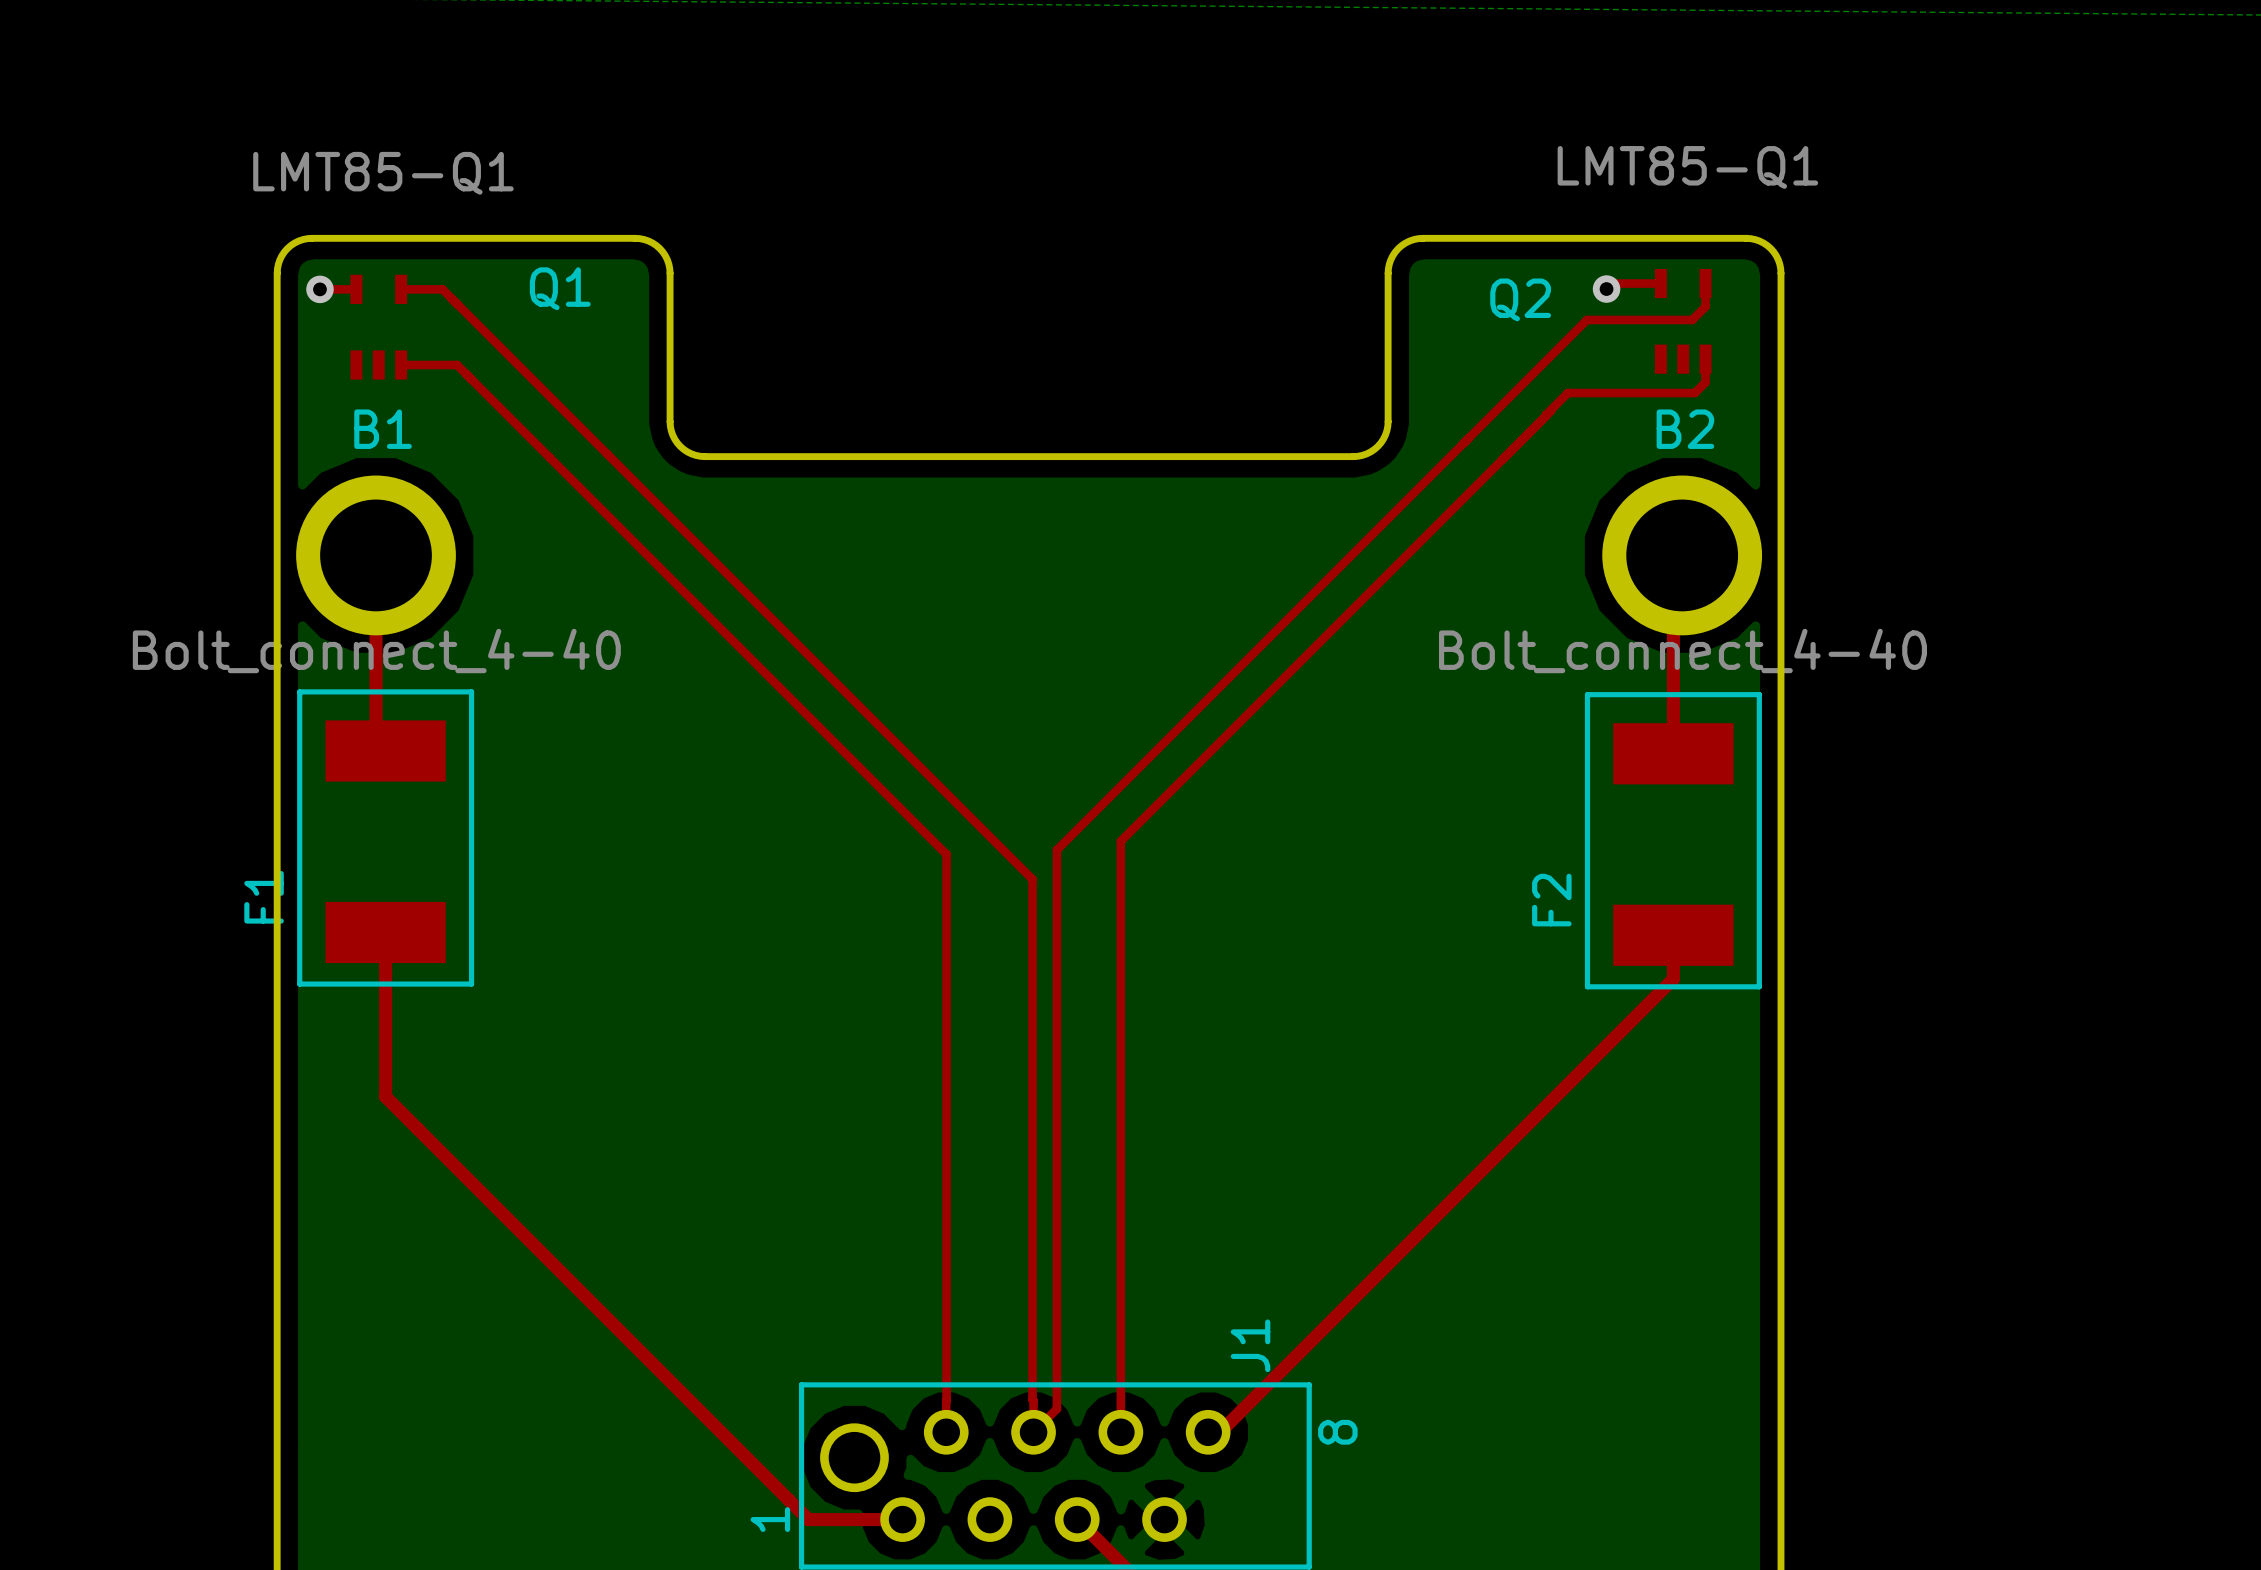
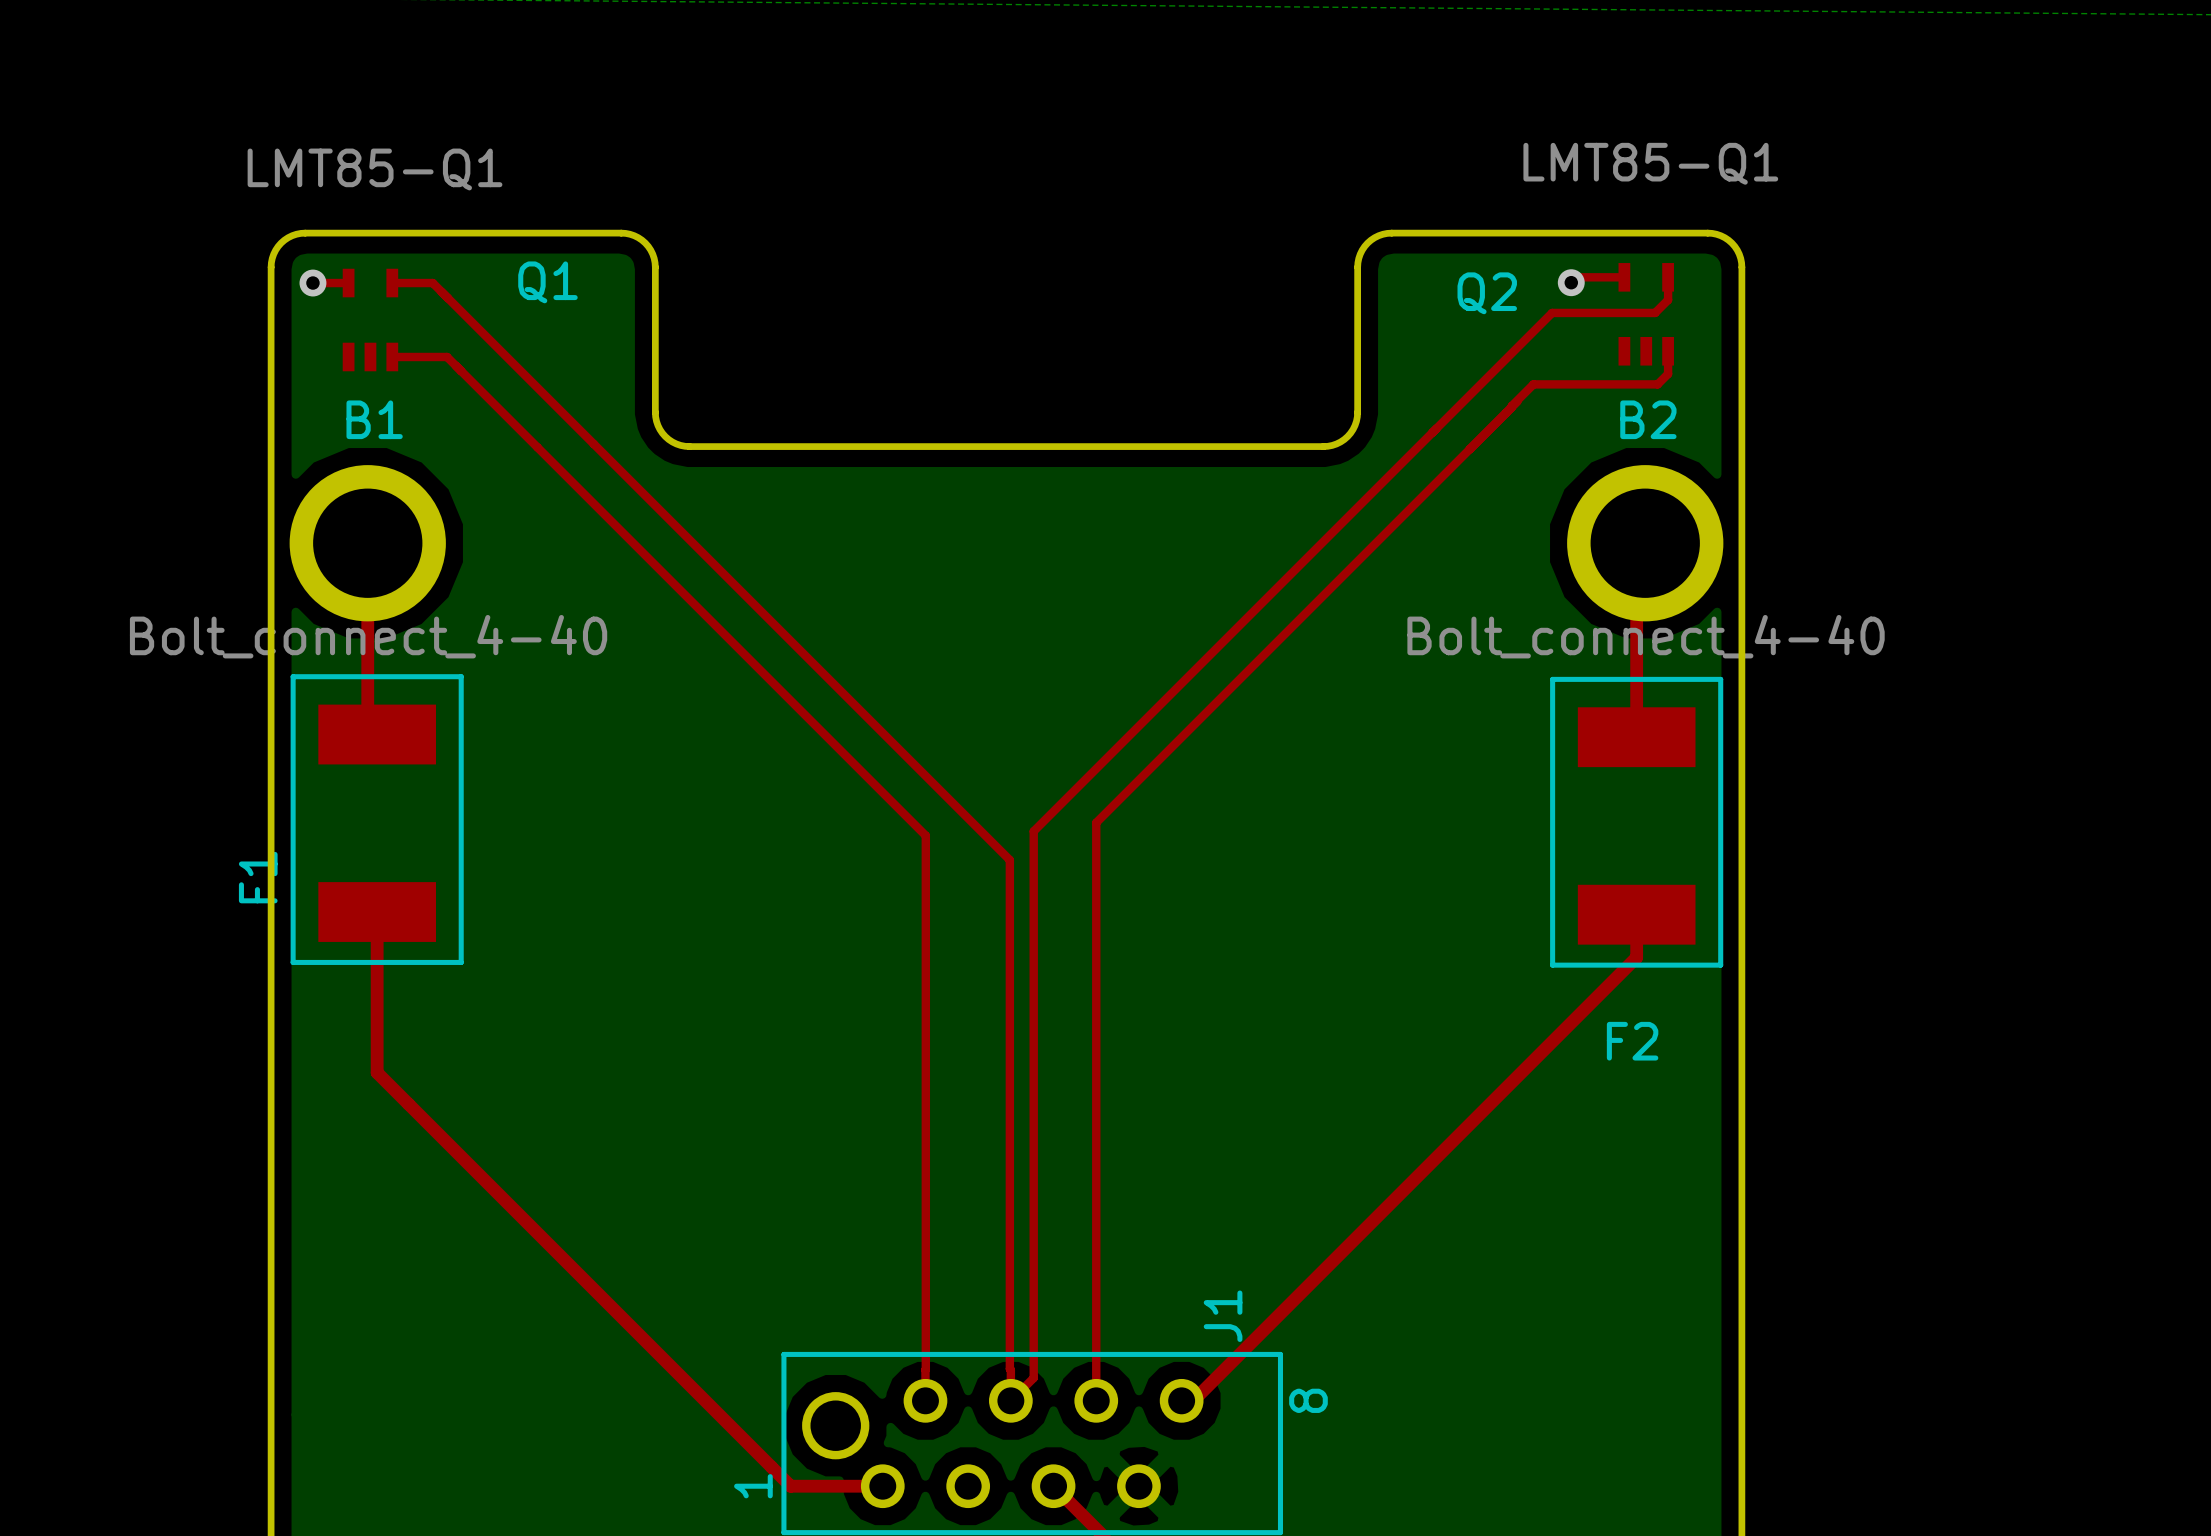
F2 name rotation: 0° (1551, 900) -> 90° clockwise (1632, 1041)
F2 name position: F2 (1551, 900) -> F2 (1632, 1041)

